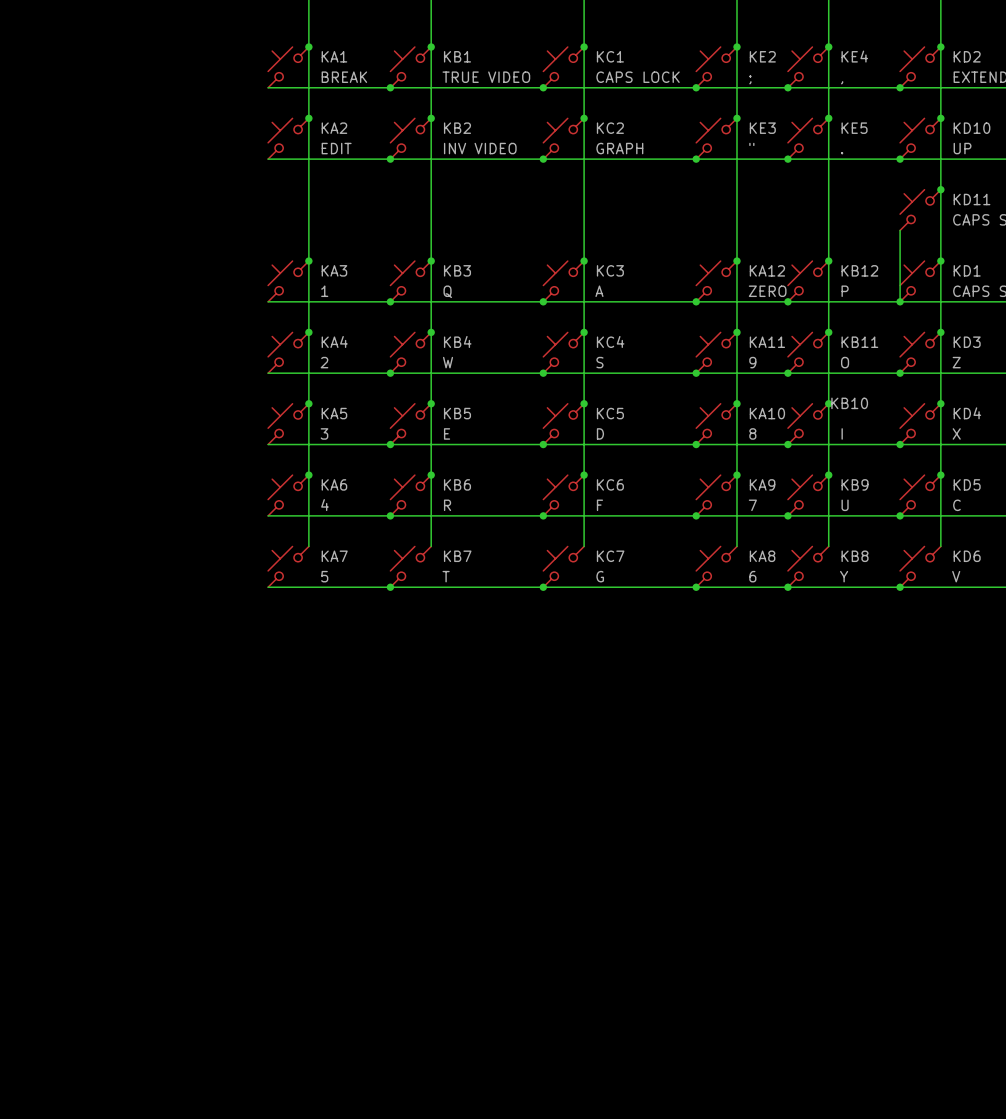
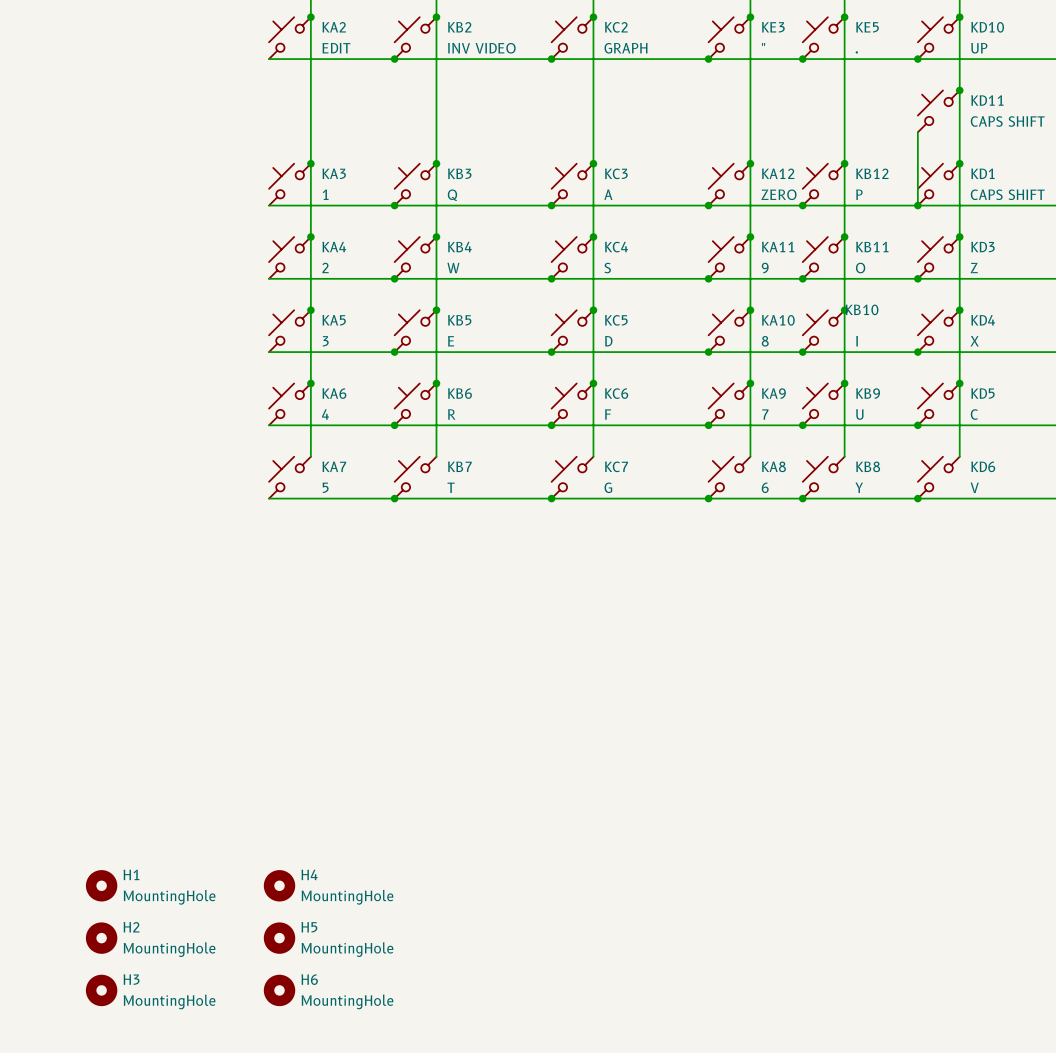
H1: none -> MountingHole (101, 885)
H4: none -> MountingHole (279, 885)
H2: none -> MountingHole (101, 938)
H5: none -> MountingHole (279, 938)
H3: none -> MountingHole (101, 990)
H6: none -> MountingHole (279, 990)

